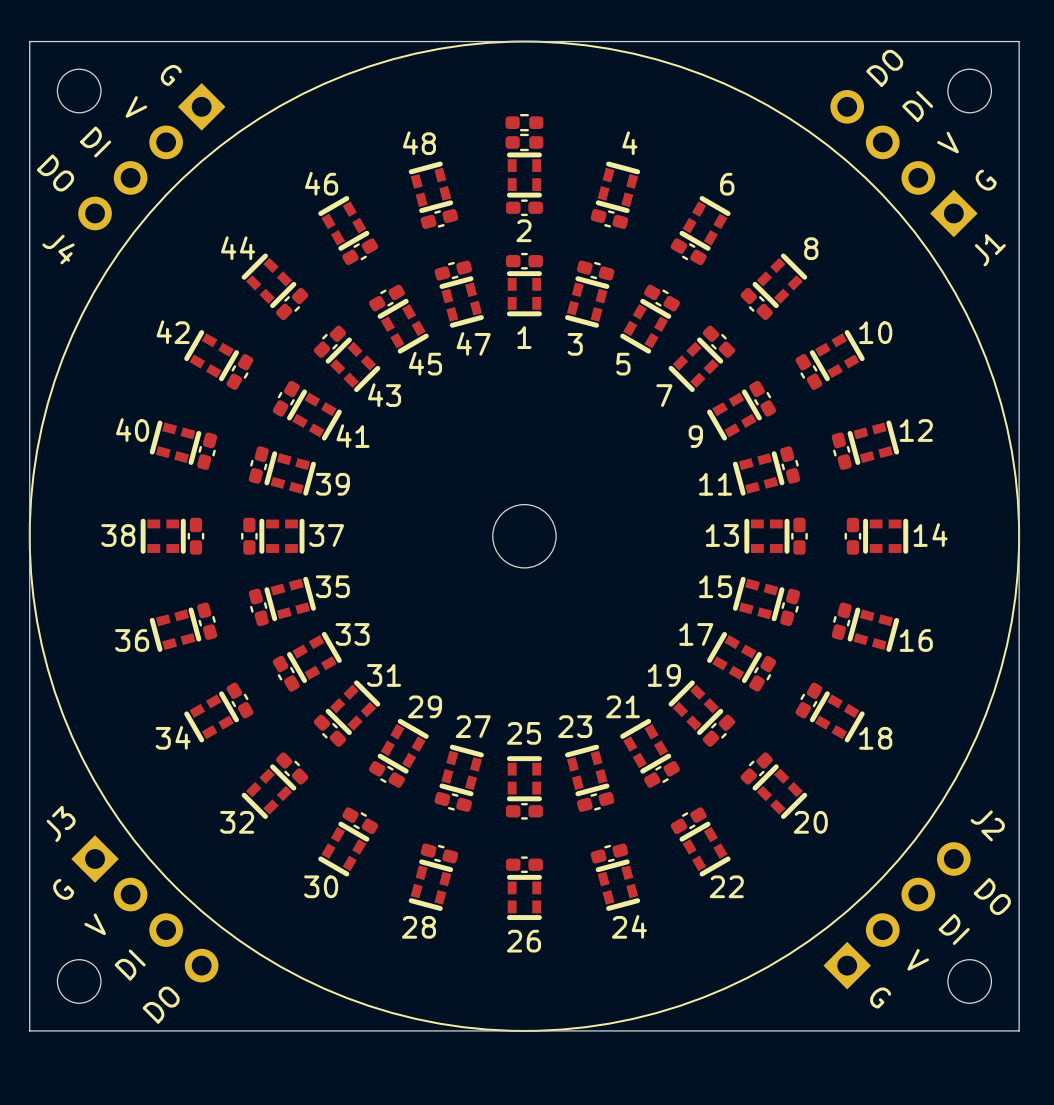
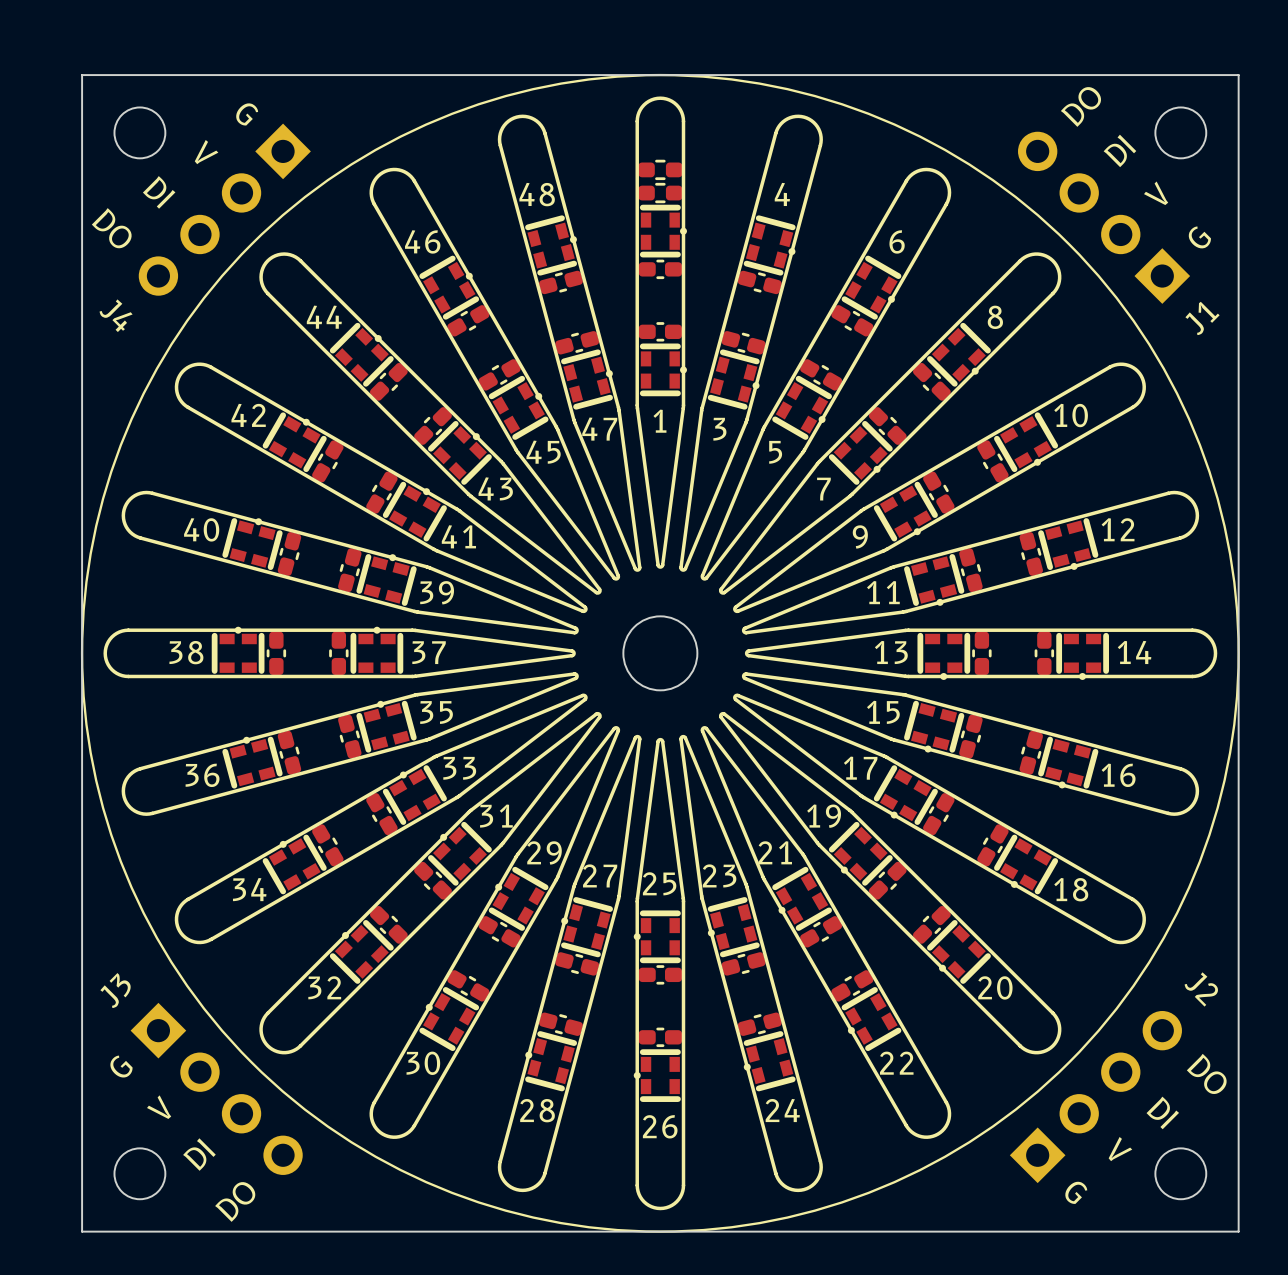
line: none -> (637, 121) (637, 406) (658, 565) (660, 567) (662, 565) (683, 406) (683, 121) (681, 112) (676, 104) (669, 99) (660, 98) (651, 99) (644, 104) (639, 112) (637, 121)
line: none -> (545, 133) (618, 409) (639, 567) (638, 569) (635, 568) (574, 421) (500, 145) (499, 136) (502, 127) (508, 121) (516, 117) (525, 116) (534, 119) (541, 125) (545, 133)
line: none -> (775, 133) (701, 409) (681, 567) (682, 569) (685, 568) (746, 421) (820, 145) (821, 137) (818, 129) (811, 120) (804, 117) (795, 116) (787, 118) (781, 123) (775, 133)
line: none -> (414, 181) (557, 428) (618, 575) (617, 578) (614, 578) (517, 451) (374, 204) (371, 196) (371, 187) (376, 177) (382, 172) (390, 169) (401, 170) (408, 174) (414, 181)
line: none -> (906, 181) (763, 428) (702, 575) (703, 578) (706, 578) (803, 451) (946, 204) (949, 195) (948, 186) (944, 178) (937, 172) (929, 169) (920, 170) (912, 174) (906, 181)
part footprint: [506, 152, 542, 198] -> [639, 204, 687, 258]
part footprint: [408, 161, 454, 214] -> [525, 215, 578, 276]
part footprint: [595, 161, 641, 214] -> [743, 215, 796, 276]
part footprint: [318, 196, 370, 251] -> [419, 255, 480, 320]
part footprint: [679, 196, 731, 251] -> [841, 255, 902, 320]
line: none -> (300, 260) (502, 462) (599, 589) (599, 592) (596, 592) (469, 495) (267, 293) (262, 286) (261, 277) (262, 268) (267, 260) (275, 255) (284, 254) (293, 255) (300, 260)
line: none -> (1020, 260) (818, 462) (721, 589) (721, 592) (724, 592) (851, 495) (1052, 293) (1057, 286) (1059, 278) (1058, 270) (1052, 260) (1046, 256) (1037, 254) (1029, 255) (1020, 260)
text: 2 (523, 230) -> none
part footprint: [241, 253, 297, 309] -> [329, 322, 394, 387]
part footprint: [752, 253, 808, 309] -> [927, 322, 991, 387]
part footprint: [506, 271, 542, 317] -> [639, 343, 687, 397]
part footprint: [439, 276, 484, 328] -> [561, 349, 613, 410]
part footprint: [565, 276, 610, 328] -> [707, 349, 760, 410]
line: none -> (211, 367) (458, 510) (585, 607) (585, 610) (582, 611) (435, 550) (188, 407) (181, 401) (177, 394) (176, 383) (179, 375) (185, 369) (192, 365) (200, 364) (211, 367)
line: none -> (1109, 367) (862, 510) (735, 607) (735, 610) (737, 611) (885, 550) (1132, 407) (1139, 401) (1143, 394) (1144, 386) (1141, 375) (1135, 369) (1125, 364) (1117, 364) (1109, 367)
part footprint: [377, 298, 429, 354] -> [488, 375, 549, 440]
part footprint: [620, 298, 672, 354] -> [772, 375, 832, 440]
part footprint: [184, 330, 239, 382] -> [262, 412, 327, 473]
part footprint: [809, 330, 865, 382] -> [994, 412, 1059, 473]
part footprint: [325, 337, 381, 393] -> [428, 420, 492, 485]
part footprint: [668, 337, 724, 393] -> [828, 420, 893, 485]
part footprint: [287, 389, 342, 441] -> [382, 481, 447, 542]
part footprint: [707, 389, 762, 441] -> [873, 481, 938, 542]
line: none -> (152, 493) (428, 567) (575, 628) (577, 631) (574, 632) (416, 611) (140, 537) (132, 534) (126, 527) (123, 518) (124, 509) (128, 501) (134, 495) (143, 492) (152, 493)
line: none -> (1168, 493) (892, 567) (745, 628) (743, 631) (746, 632) (904, 611) (1180, 537) (1188, 534) (1194, 527) (1197, 518) (1196, 509) (1192, 501) (1185, 495) (1177, 492) (1168, 493)
part footprint: [149, 420, 202, 465] -> [222, 518, 283, 571]
part footprint: [847, 420, 900, 465] -> [1038, 518, 1099, 571]
part footprint: [264, 451, 316, 496] -> [356, 554, 417, 606]
part footprint: [732, 451, 785, 496] -> [904, 554, 965, 606]
line: none -> (128, 630) (413, 630) (572, 651) (574, 653) (572, 655) (413, 676) (128, 676) (119, 674) (111, 669) (106, 662) (105, 653) (106, 644) (111, 636) (119, 631) (128, 630)
line: none -> (908, 630) (1195, 630) (1203, 633) (1210, 639) (1214, 647) (1215, 656) (1208, 669) (1201, 674) (1192, 676) (908, 676) (748, 655) (746, 653) (748, 651) (908, 630)
part footprint: [140, 518, 186, 554] -> [211, 626, 265, 674]
part footprint: [259, 518, 305, 554] -> [350, 626, 404, 674]
part footprint: [744, 518, 790, 554] -> [917, 632, 971, 680]
part footprint: [863, 518, 909, 554] -> [1056, 632, 1109, 680]
line: none -> (574, 673) (416, 694) (140, 768) (132, 772) (126, 779) (123, 788) (124, 797) (128, 805) (134, 811) (149, 813) (426, 739) (575, 678) (577, 675) (574, 673)
line: none -> (746, 673) (904, 694) (1180, 768) (1188, 772) (1194, 779) (1197, 788) (1196, 797) (1192, 805) (1185, 811) (1171, 813) (894, 739) (745, 678) (743, 675) (746, 673)
line: none -> (582, 695) (435, 756) (188, 899) (180, 906) (176, 914) (176, 923) (179, 930) (185, 937) (192, 941) (200, 942) (208, 940) (457, 797) (585, 699) (585, 696) (582, 695)
line: none -> (737, 695) (885, 756) (1132, 899) (1139, 904) (1143, 914) (1143, 923) (1141, 930) (1135, 937) (1128, 941) (1120, 942) (1112, 940) (863, 797) (735, 699) (735, 696) (737, 695)
part footprint: [264, 576, 316, 622] -> [356, 700, 417, 753]
part footprint: [732, 576, 785, 622] -> [904, 700, 965, 753]
line: none -> (596, 714) (469, 811) (267, 1013) (262, 1022) (261, 1030) (263, 1039) (267, 1045) (274, 1050) (282, 1052) (291, 1051) (298, 1047) (501, 845) (599, 717) (599, 714) (596, 714)
line: none -> (724, 714) (851, 811) (1052, 1013) (1057, 1020) (1059, 1028) (1057, 1039) (1052, 1045) (1046, 1050) (1037, 1052) (1029, 1051) (1022, 1047) (819, 845) (721, 717) (721, 714) (724, 714)
line: none -> (614, 728) (517, 855) (374, 1102) (371, 1113) (372, 1121) (376, 1128) (382, 1134) (390, 1136) (398, 1136) (406, 1133) (412, 1127) (556, 879) (618, 730) (617, 728) (614, 728)
line: none -> (706, 728) (803, 855) (946, 1102) (949, 1110) (949, 1118) (944, 1128) (937, 1134) (930, 1136) (921, 1136) (914, 1133) (907, 1127) (764, 879) (702, 730) (703, 728) (706, 728)
part footprint: [149, 607, 202, 652] -> [222, 736, 283, 789]
part footprint: [847, 607, 900, 652] -> [1038, 736, 1099, 789]
line: none -> (635, 738) (574, 885) (500, 1161) (499, 1170) (502, 1178) (508, 1185) (516, 1189) (531, 1188) (539, 1183) (544, 1176) (618, 898) (639, 739) (638, 736) (635, 738)
line: none -> (685, 738) (746, 885) (820, 1161) (820, 1170) (818, 1178) (812, 1185) (804, 1189) (789, 1188) (781, 1183) (776, 1176) (702, 898) (681, 739) (682, 736) (685, 738)
line: none -> (658, 741) (637, 899) (637, 1185) (639, 1194) (644, 1201) (651, 1206) (660, 1208) (669, 1206) (676, 1201) (683, 1188) (683, 901) (662, 741) (660, 739) (658, 741)
part footprint: [287, 631, 342, 684] -> [382, 765, 447, 825]
part footprint: [707, 631, 762, 684] -> [873, 765, 938, 825]
part footprint: [325, 680, 381, 736] -> [428, 821, 492, 886]
part footprint: [668, 680, 724, 736] -> [828, 821, 893, 886]
part footprint: [184, 691, 239, 743] -> [262, 834, 327, 895]
part footprint: [809, 691, 865, 743] -> [994, 834, 1059, 895]
part footprint: [377, 718, 429, 774] -> [488, 866, 549, 931]
part footprint: [620, 718, 672, 774] -> [772, 866, 832, 931]
part footprint: [439, 744, 484, 797] -> [561, 897, 613, 958]
part footprint: [565, 744, 610, 797] -> [707, 897, 760, 958]
part footprint: [506, 756, 542, 802] -> [633, 910, 681, 964]
part footprint: [241, 764, 297, 819] -> [329, 920, 394, 984]
part footprint: [752, 764, 808, 819] -> [927, 920, 991, 984]
part footprint: [318, 821, 370, 877] -> [419, 987, 480, 1052]
part footprint: [679, 821, 731, 877] -> [841, 987, 902, 1052]
part footprint: [408, 859, 454, 911] -> [525, 1031, 578, 1092]
part footprint: [595, 859, 641, 911] -> [743, 1031, 796, 1092]
part footprint: [506, 874, 542, 921] -> [633, 1049, 681, 1102]

